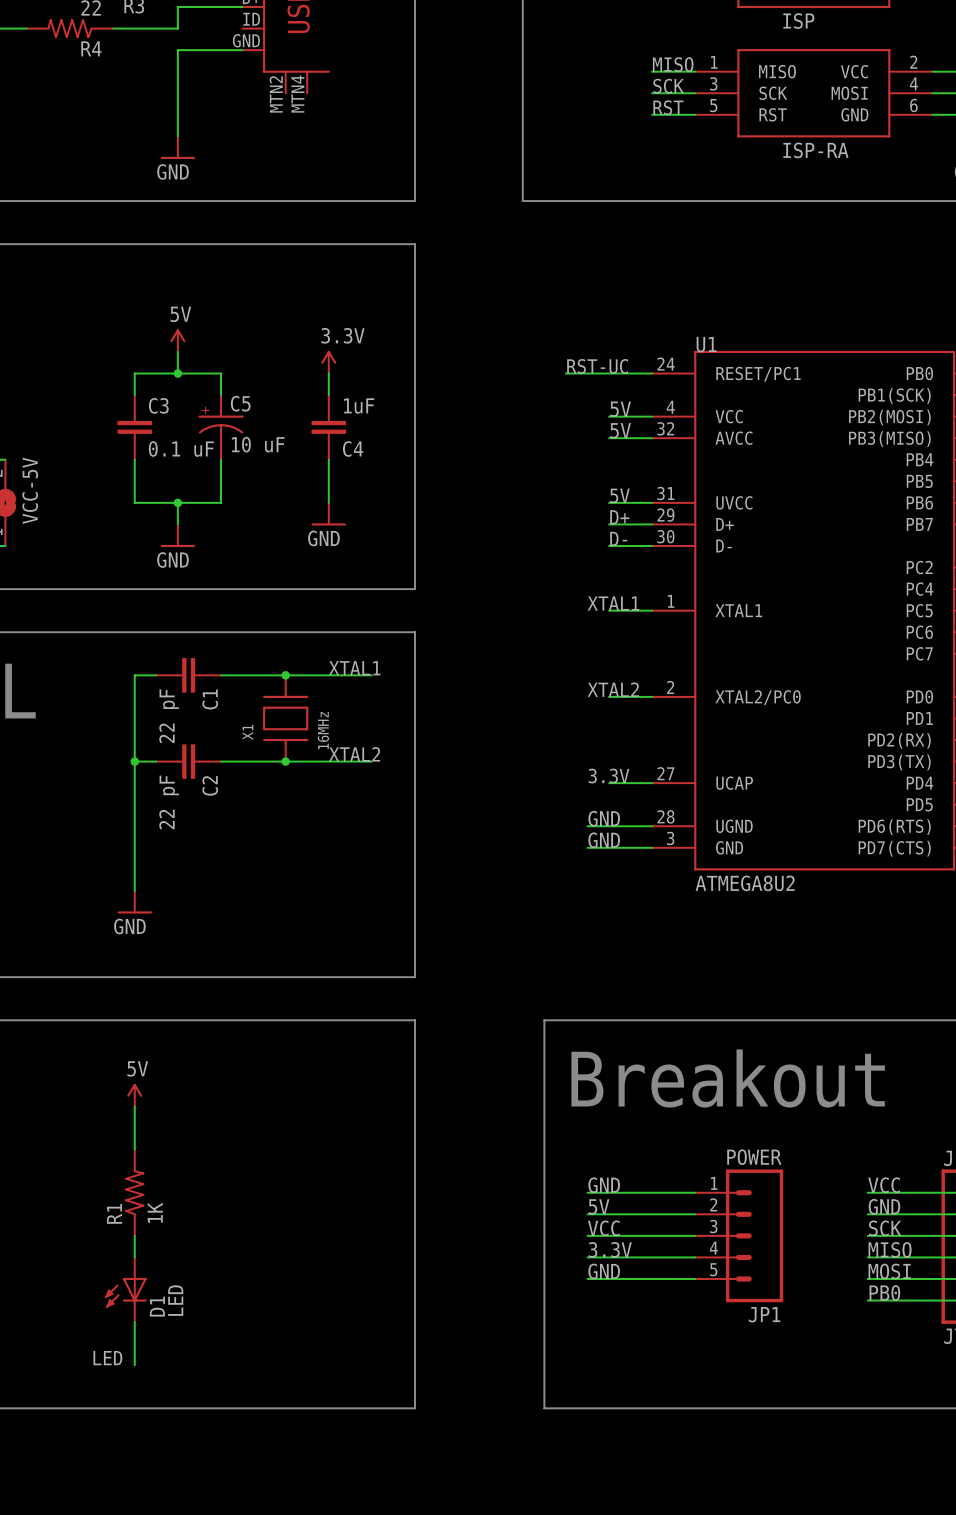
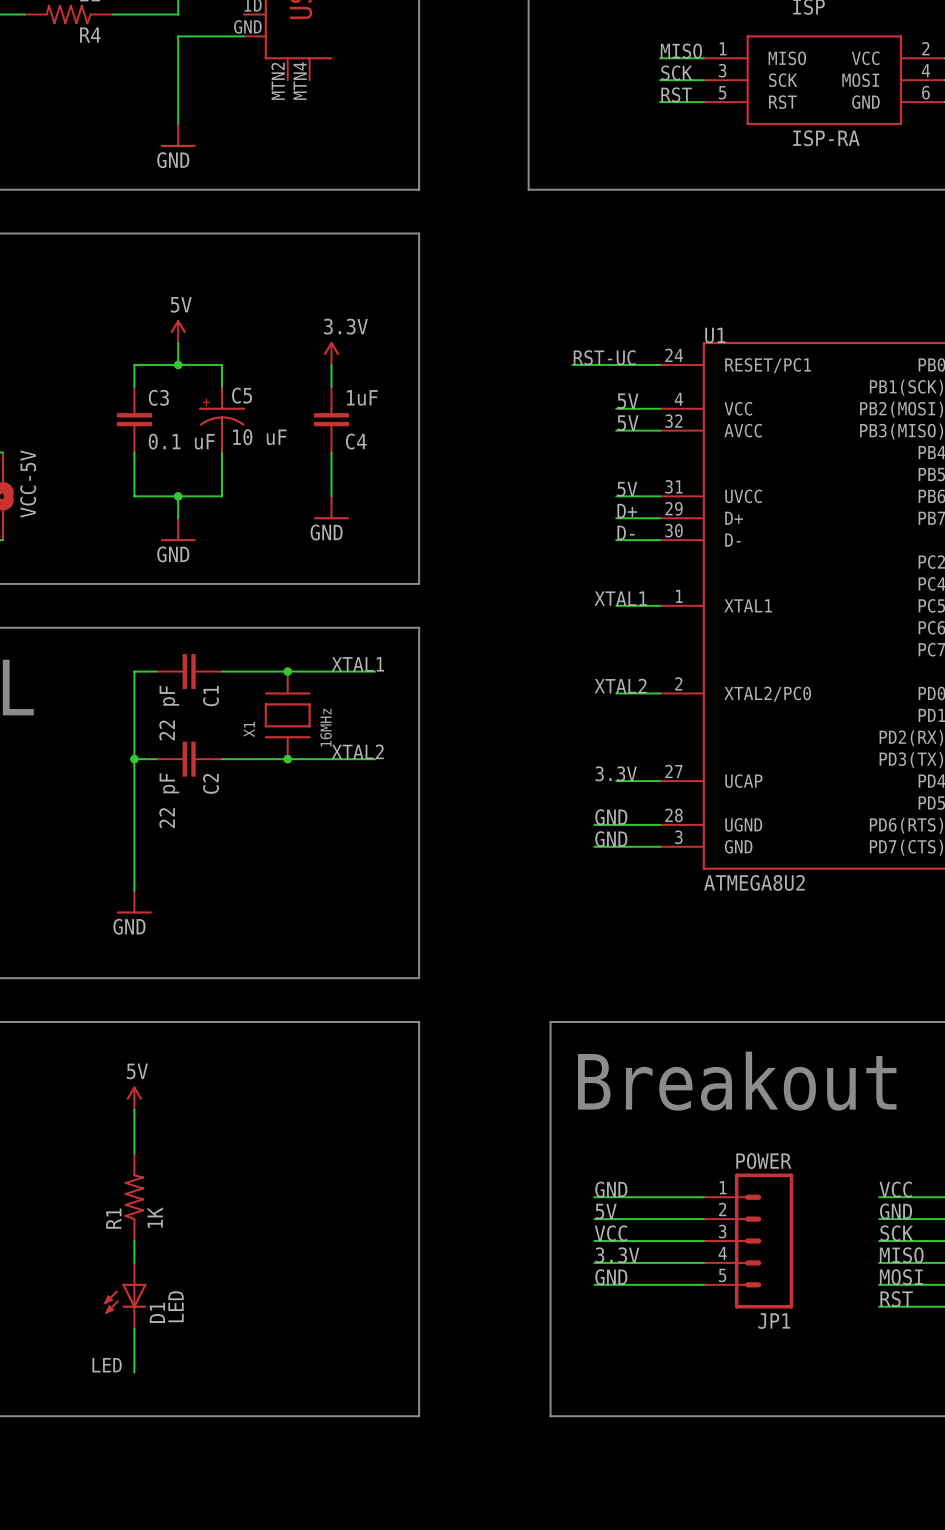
label: PB0 (884, 1293) -> RST (896, 1299)

